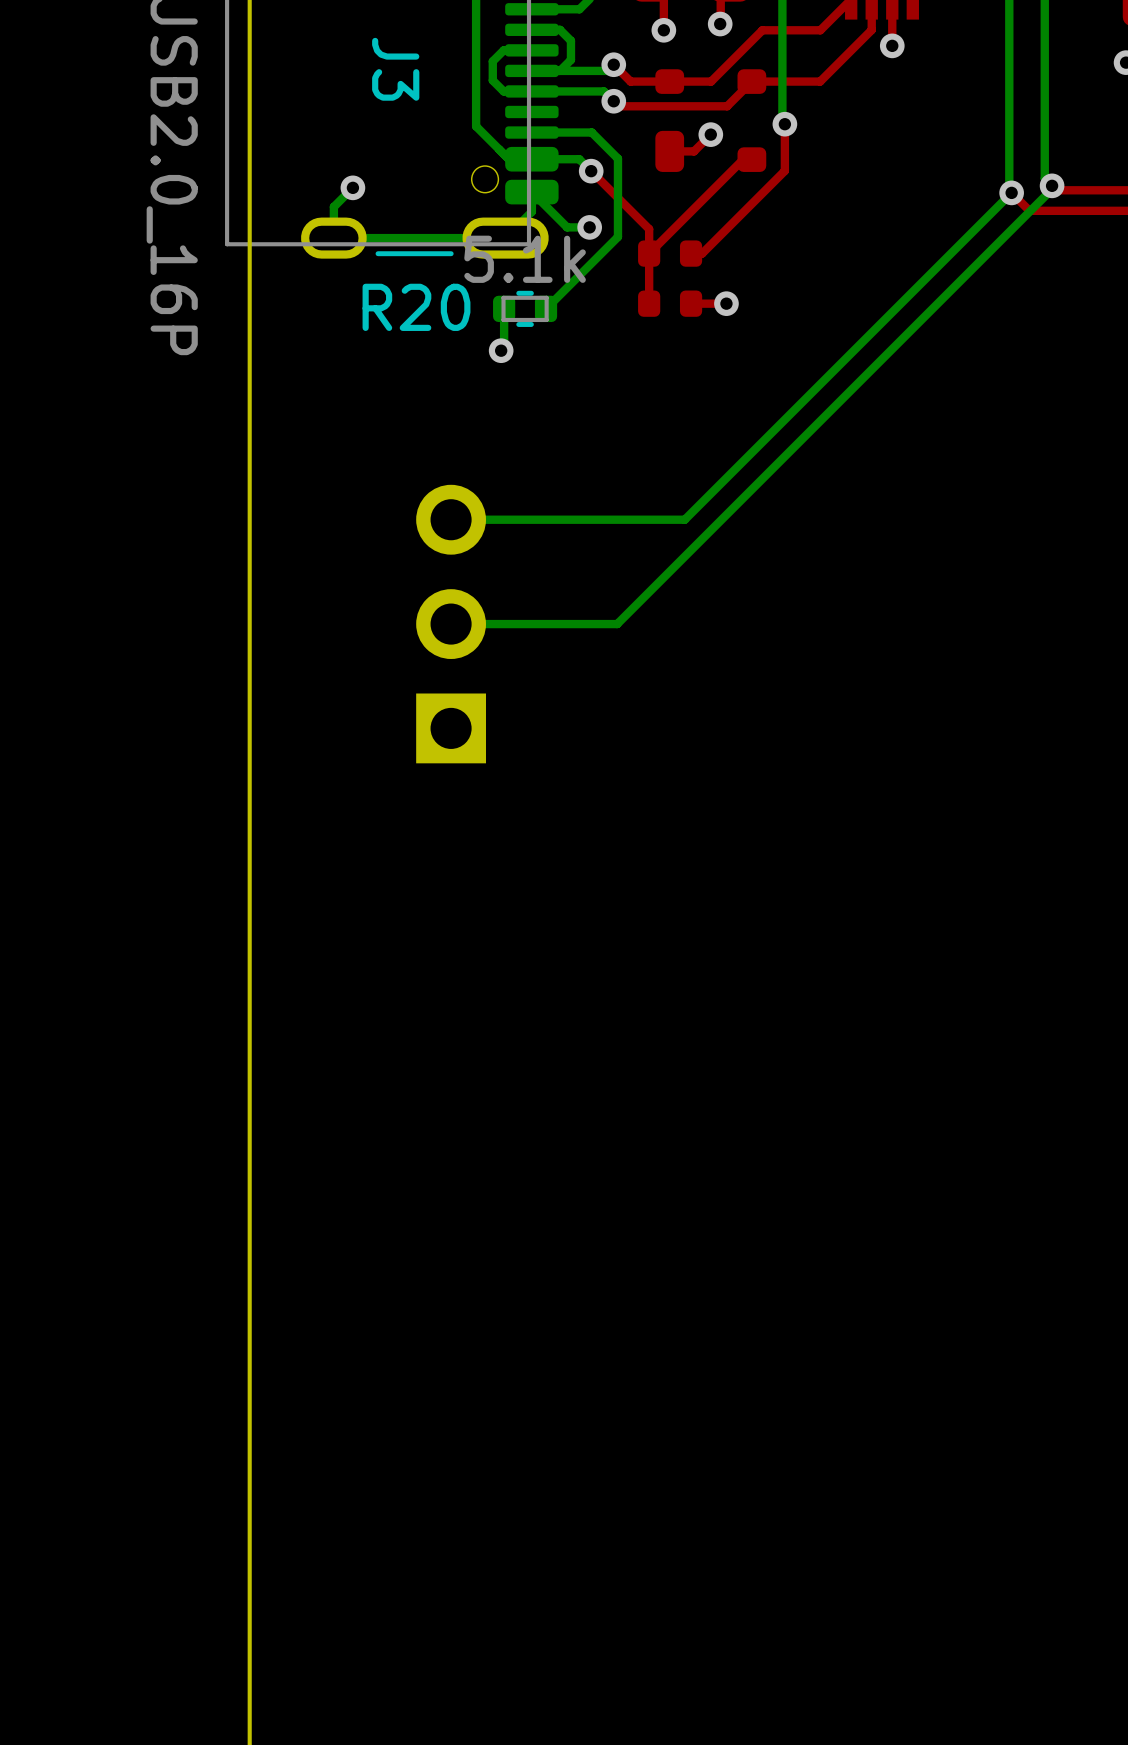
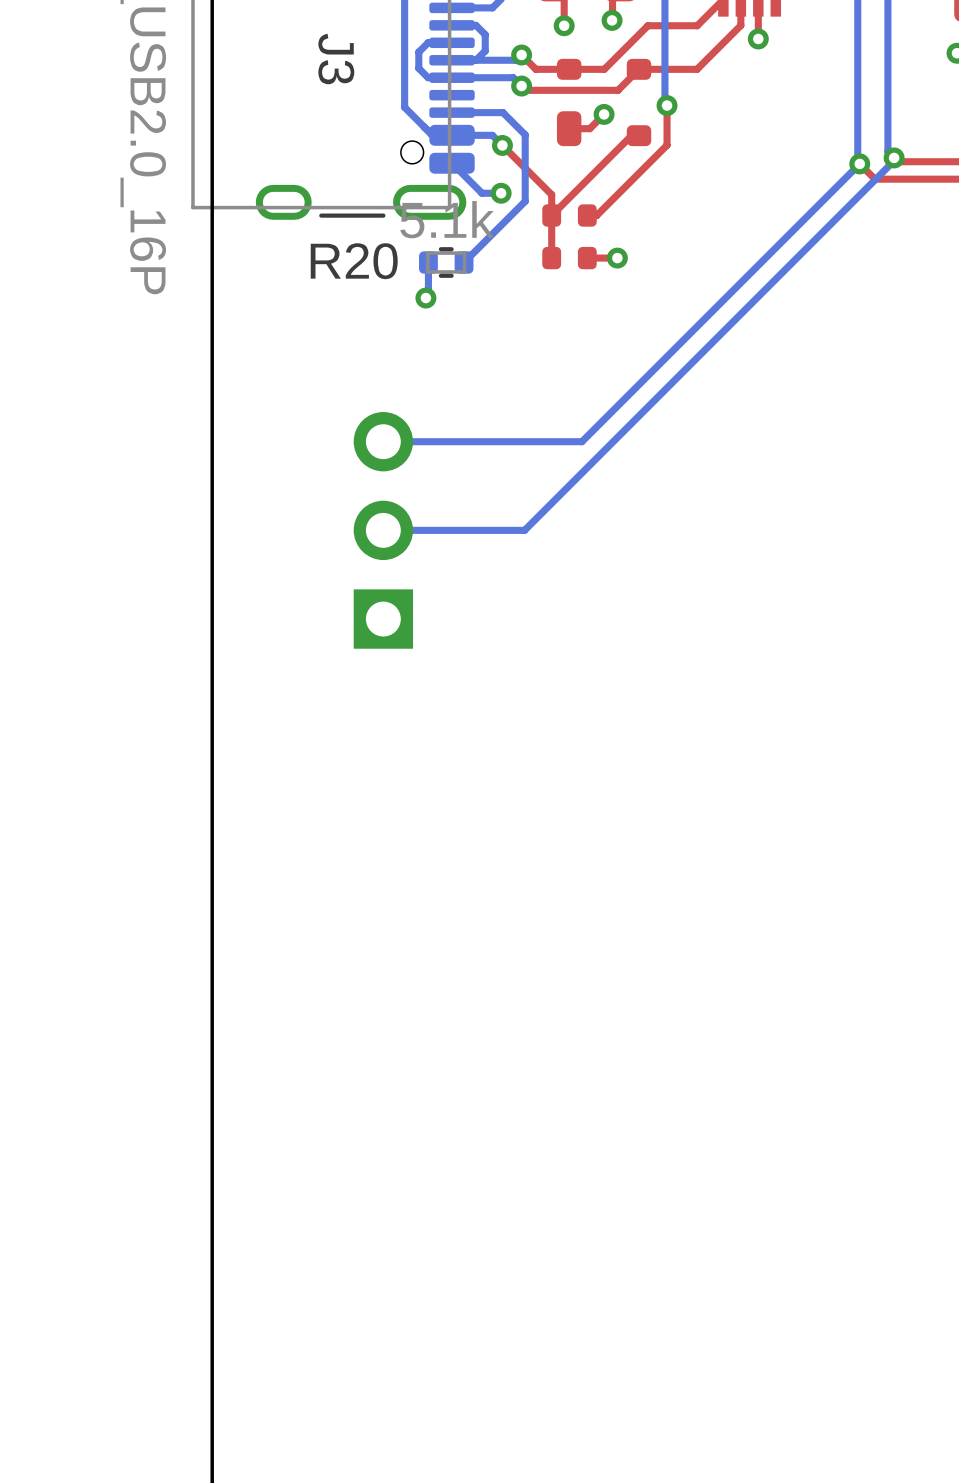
bottom track: (352, 187) (333, 206) (333, 238) (505, 238) (531, 211) (531, 192) -> none
via: (352, 187) -> none

